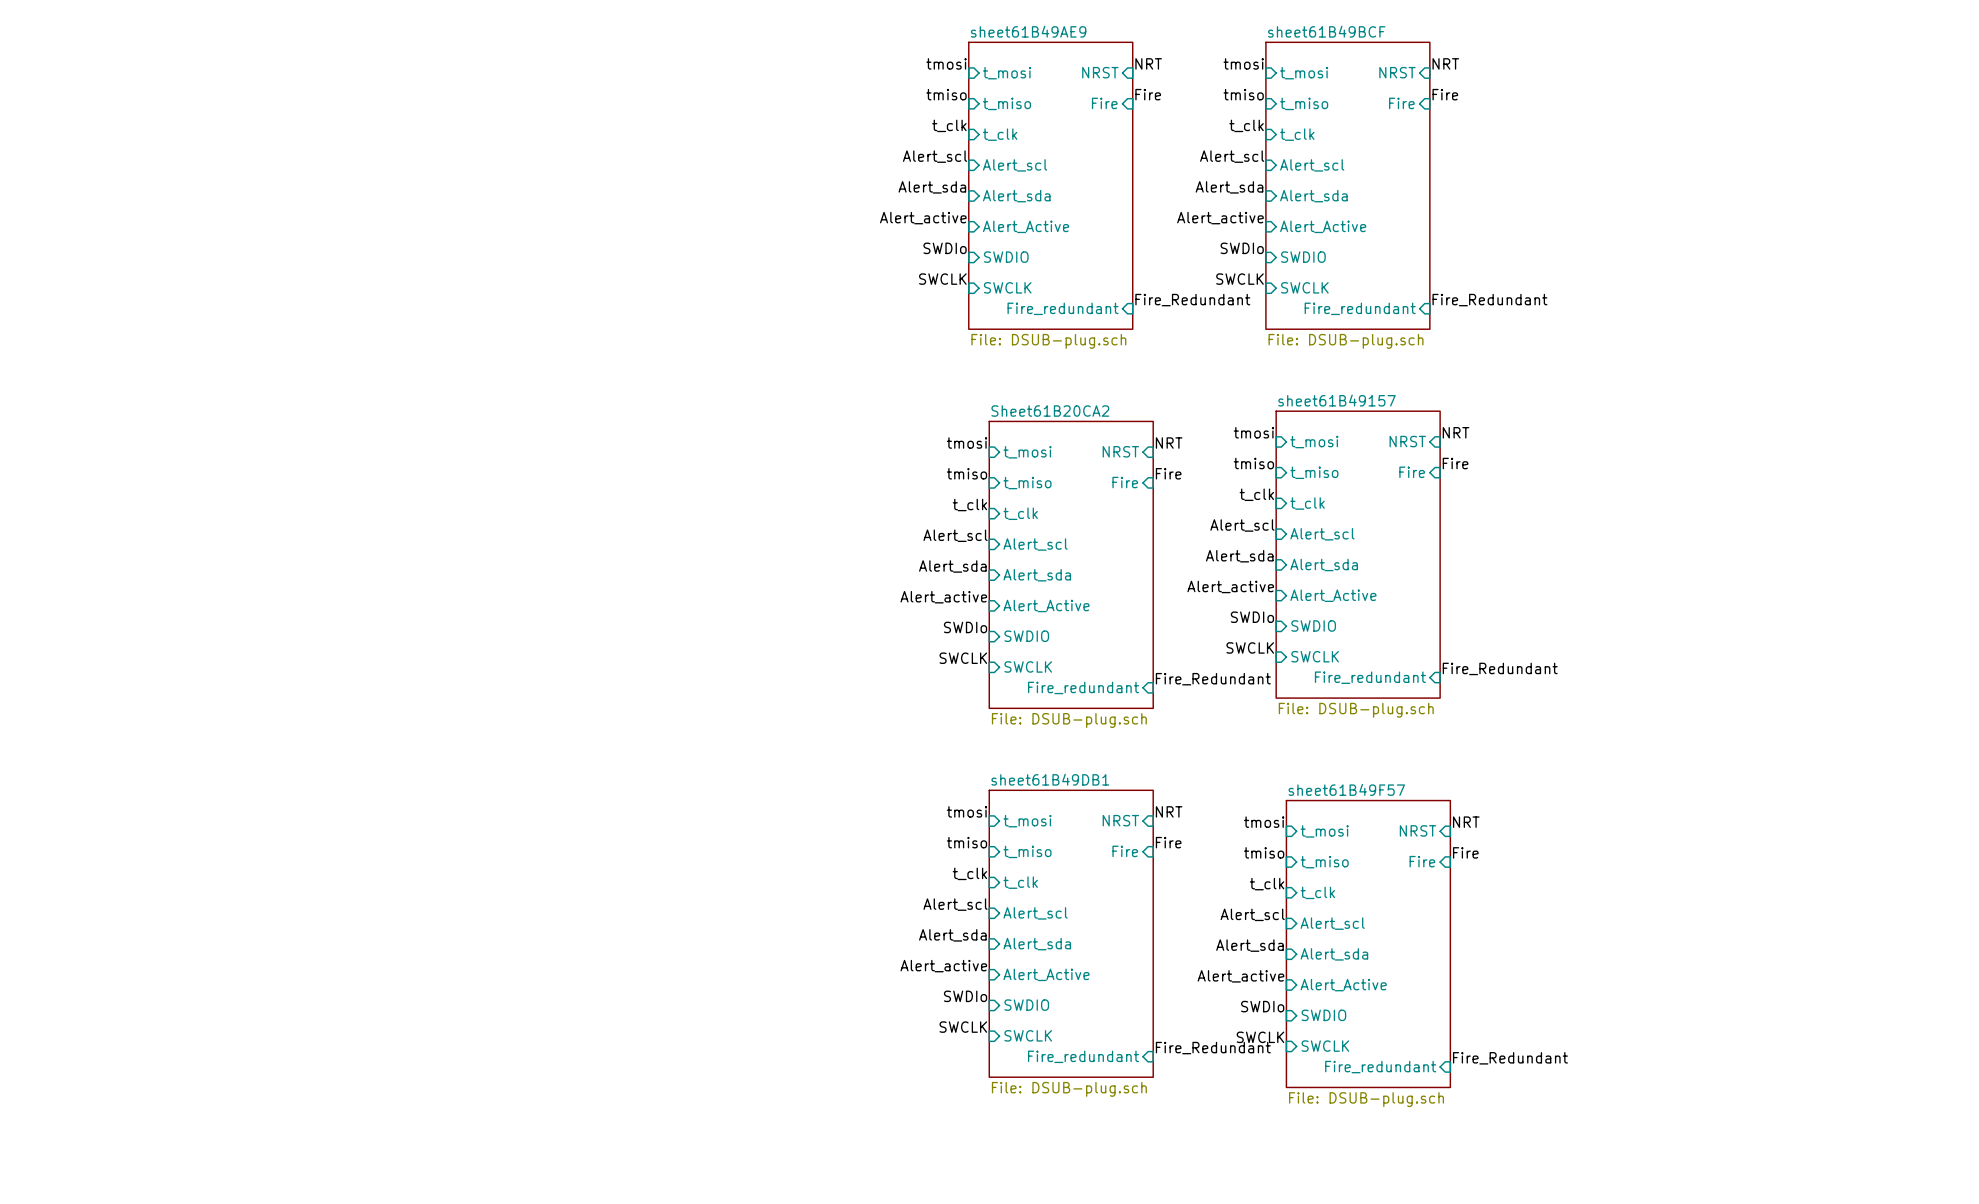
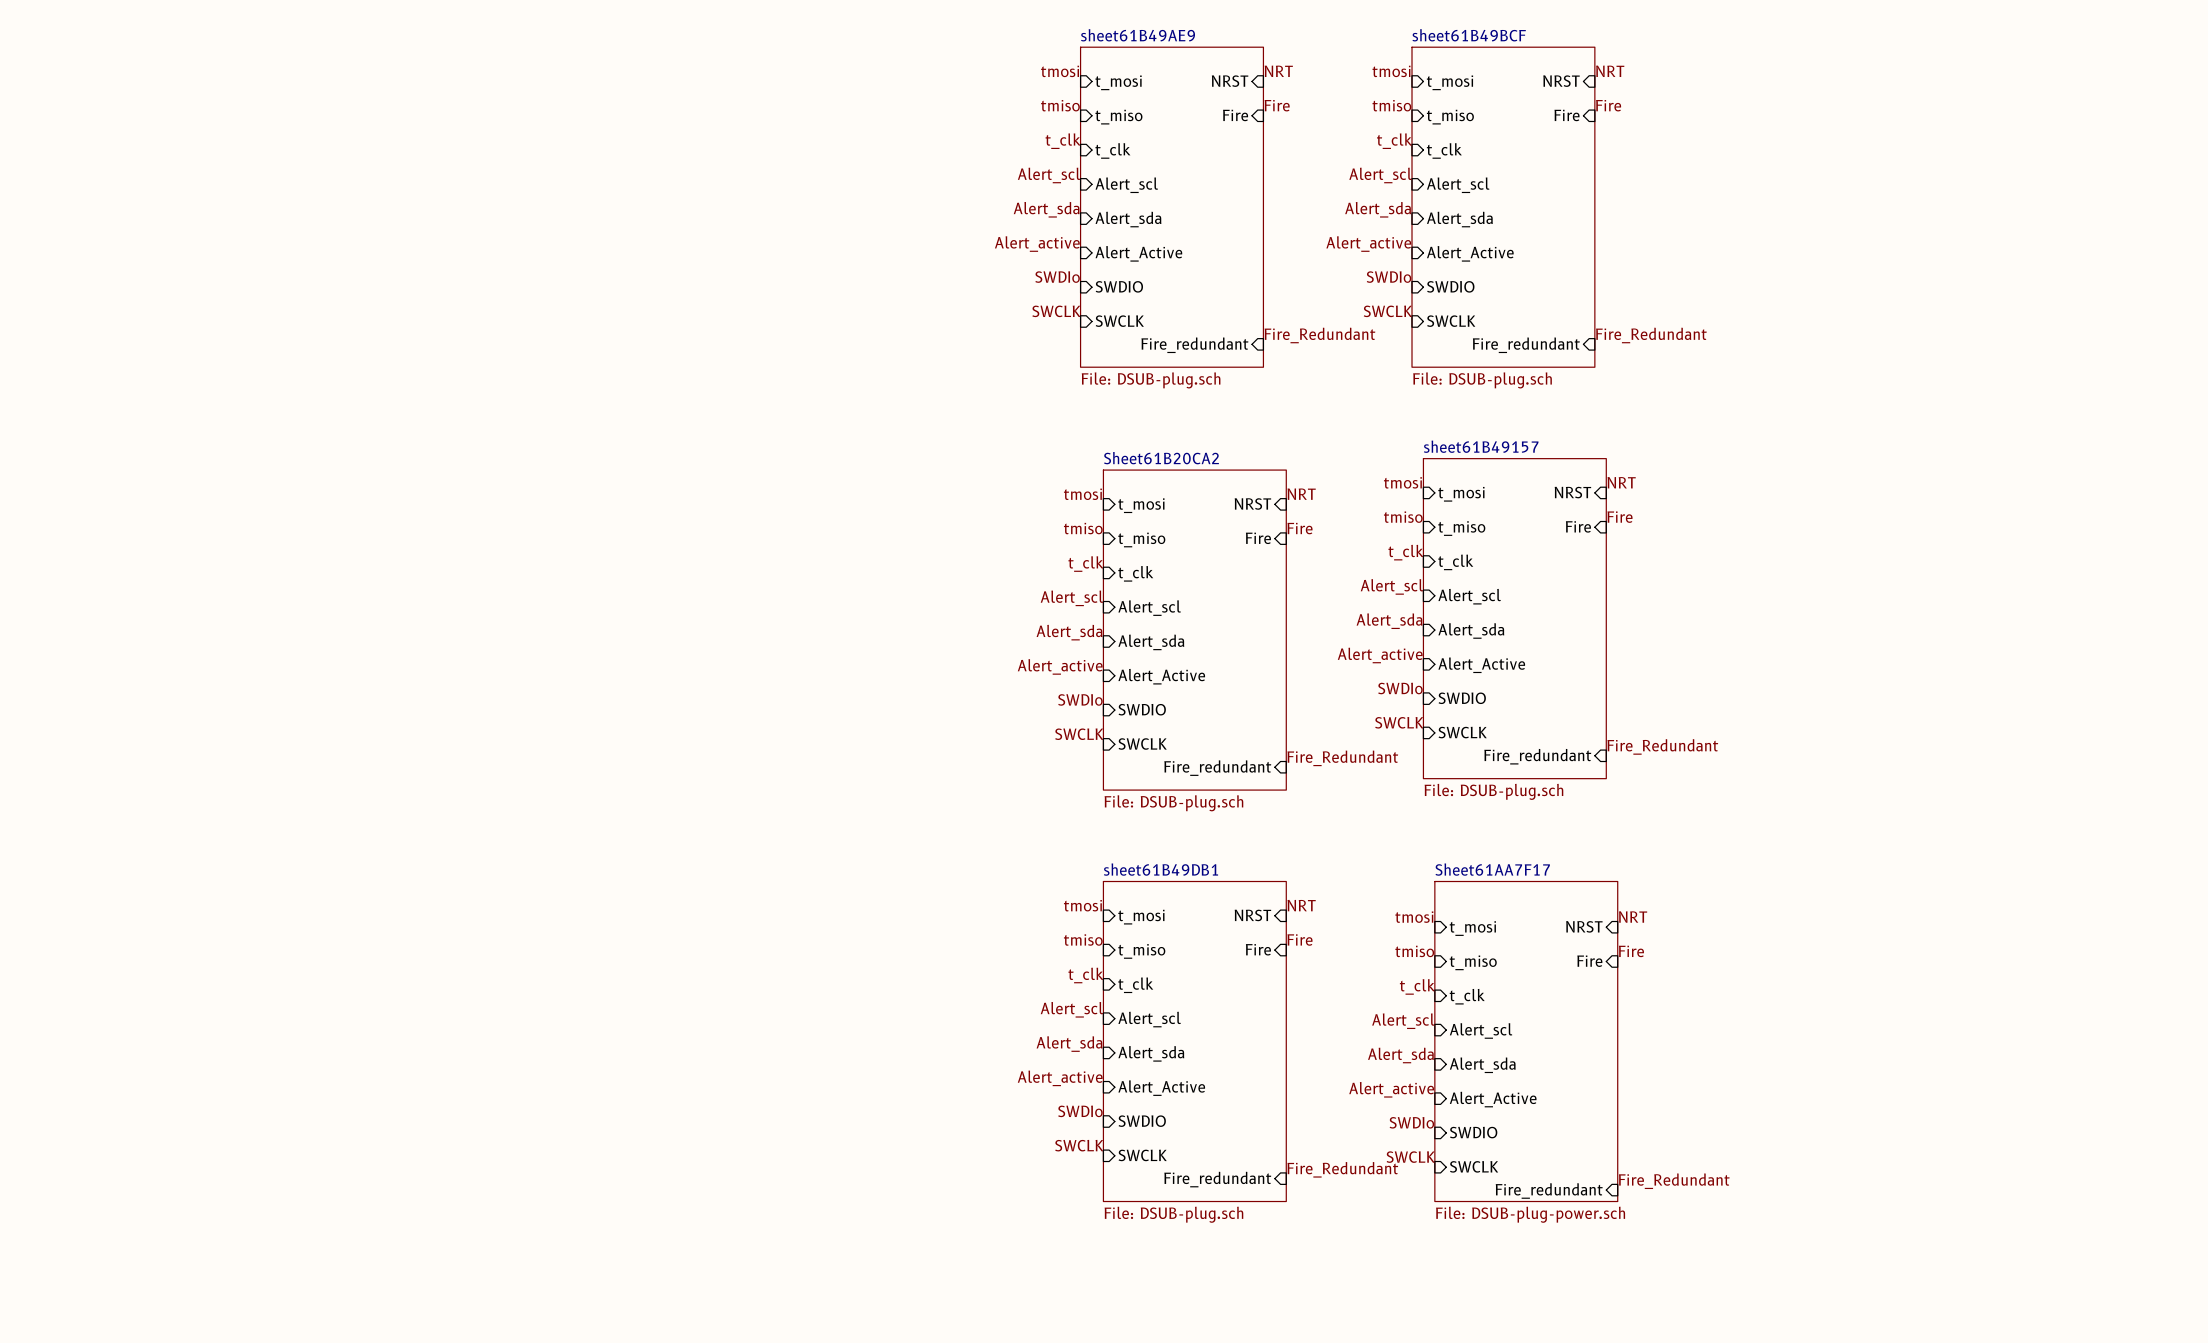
sheet Sheet61AA7F17: none -> File: DSUB-plug-power.sch (1526, 1041)
sheet sheet61B49F57: File: DSUB-plug.sch (1368, 944) -> none

